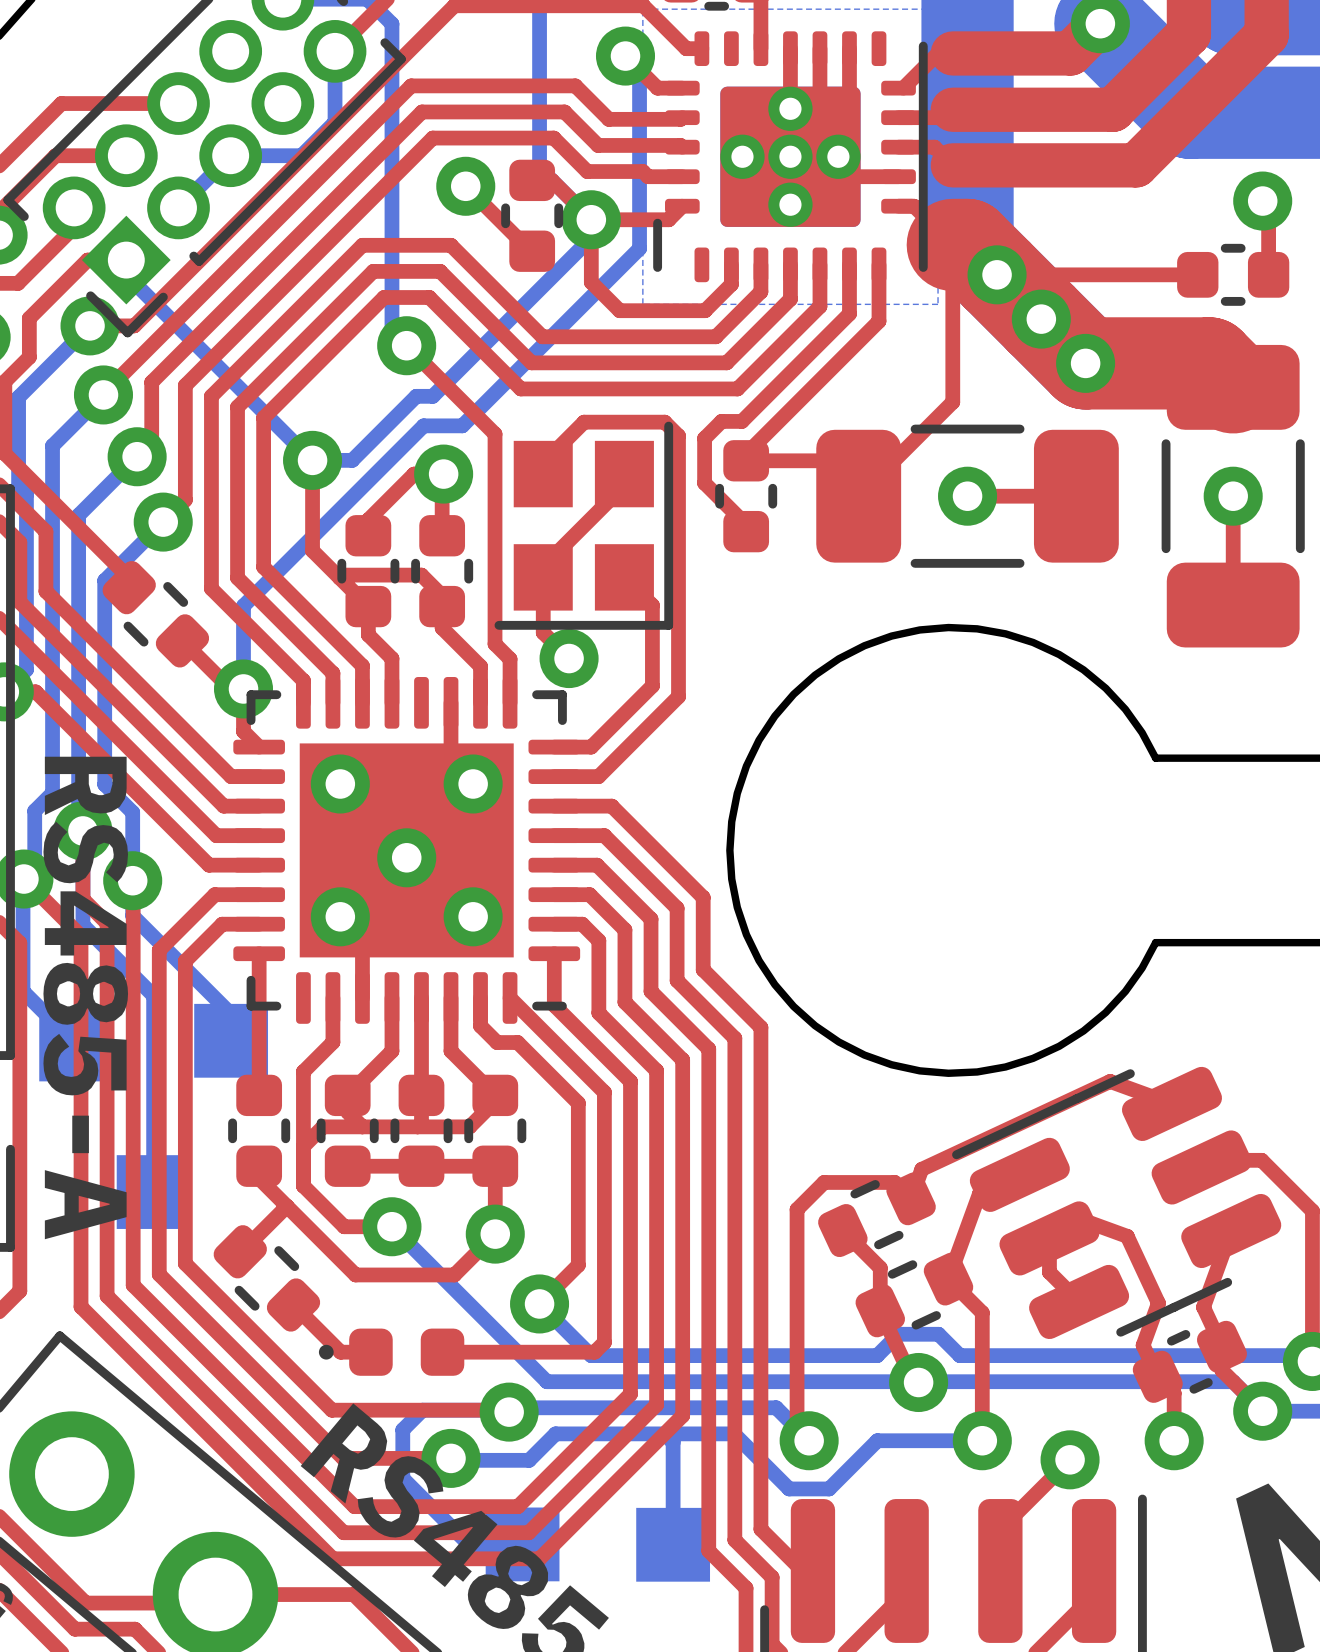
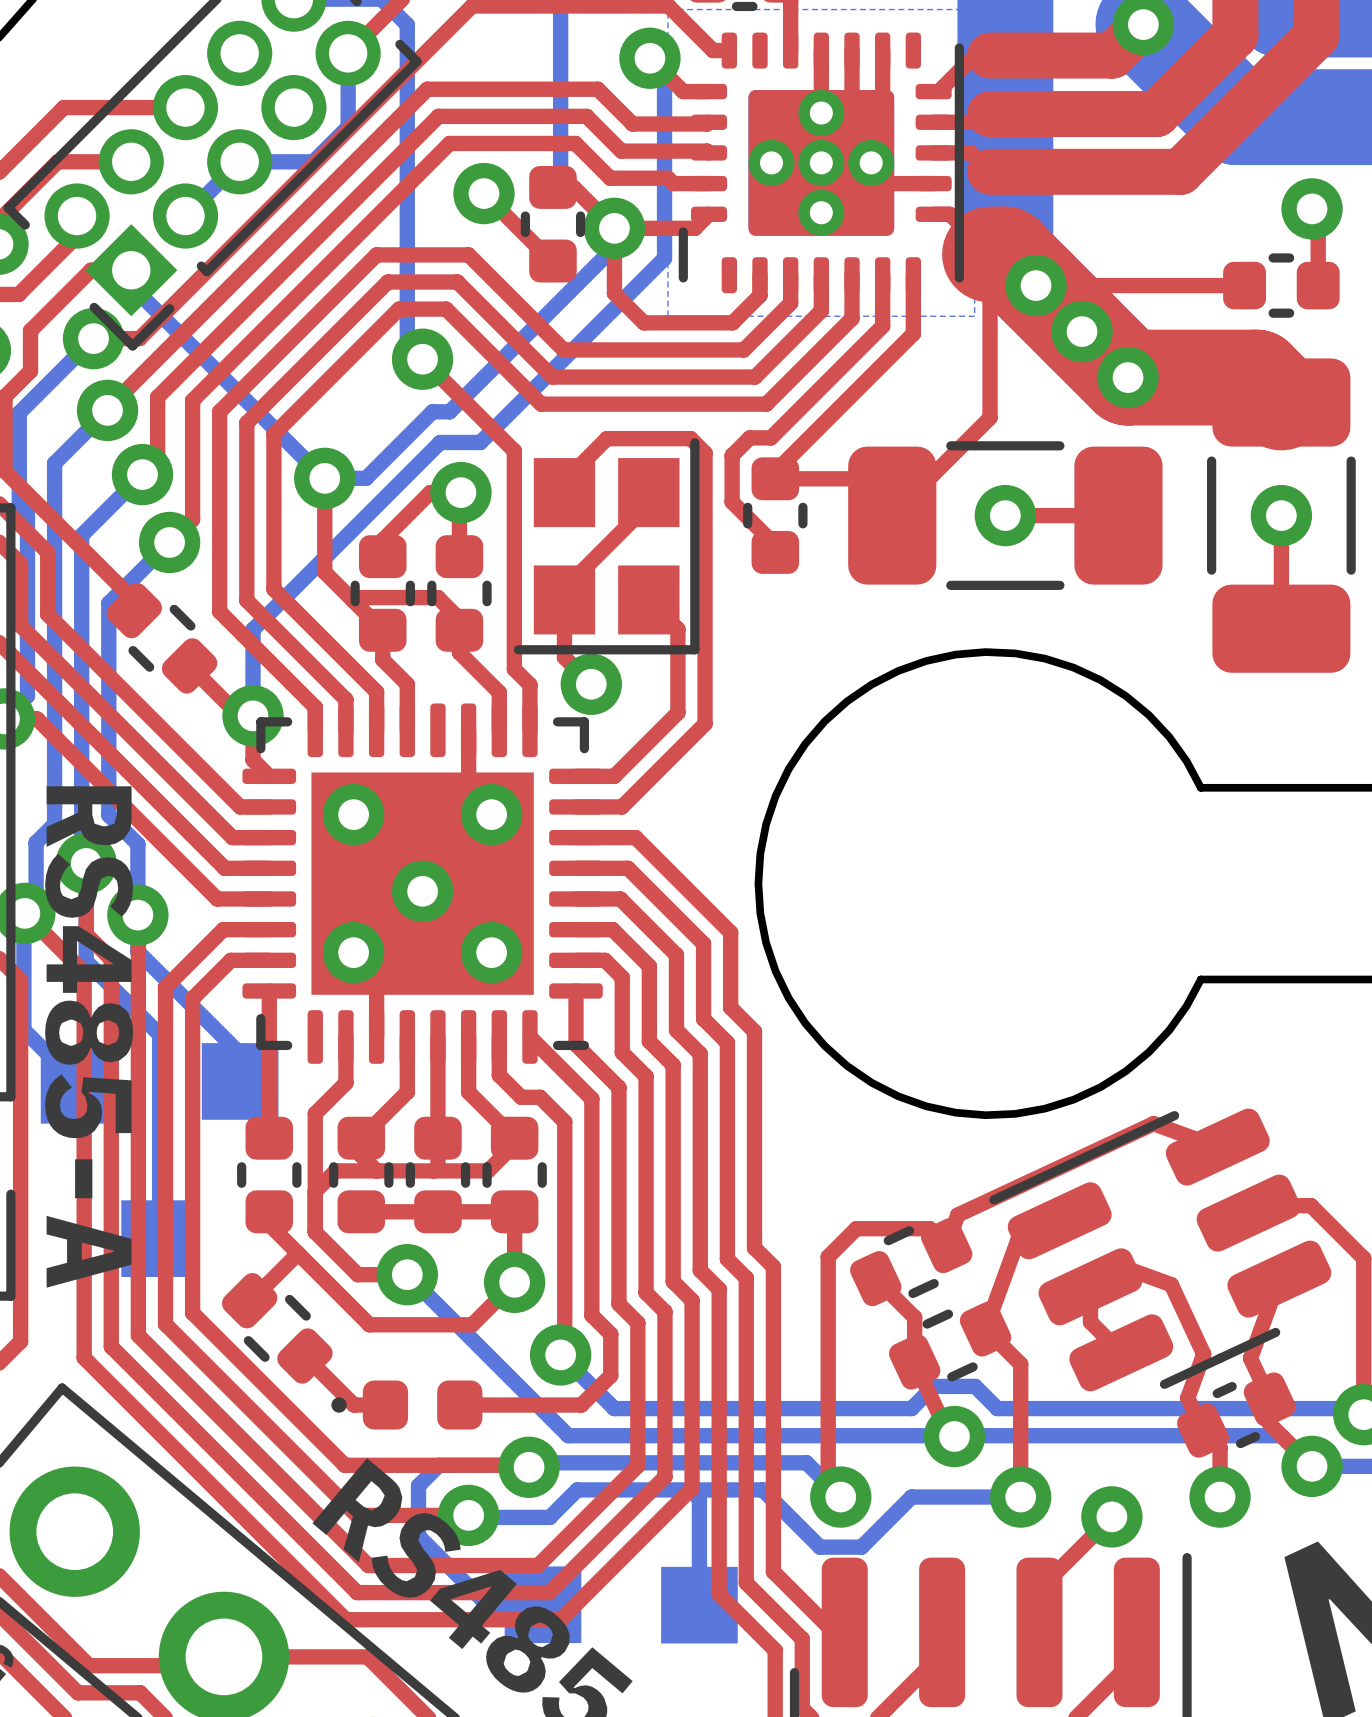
top track: (726, 992) (760, 1027) (760, 1529) -> (754, 1031) (754, 1247) (773, 1266) (773, 1571) (790, 1589)
top track: (700, 1003) (734, 1038) (734, 1540) -> (727, 1042) (727, 1259) (746, 1278) (746, 1583) (763, 1600)
top track: (673, 1014) (708, 1049) (708, 1550) -> (700, 1053) (700, 1270) (719, 1289) (719, 1594) (736, 1611)
top track: (480, 1025) (497, 1042) (517, 1042) (578, 1103) (578, 1265) (543, 1300) -> (499, 1066) (499, 1075) (521, 1097) (540, 1097) (564, 1121) (564, 1350)
top track: (647, 1025) (682, 1059) (682, 1415) (666, 1432) -> (673, 1065) (673, 1281) (692, 1300) (692, 1488)
top track: (621, 1035) (656, 1070) (656, 1404) (639, 1421) -> (646, 1076) (646, 1292) (664, 1311) (664, 1477)
top track: (595, 1046) (630, 1081) (630, 1394) (613, 1410) -> (618, 1087) (618, 1304) (637, 1322) (637, 1465)
top track: (569, 1057) (604, 1092) (604, 1342) (594, 1352) (559, 1352) -> (591, 1098) (591, 1315) (610, 1334) (610, 1375) (581, 1405)

